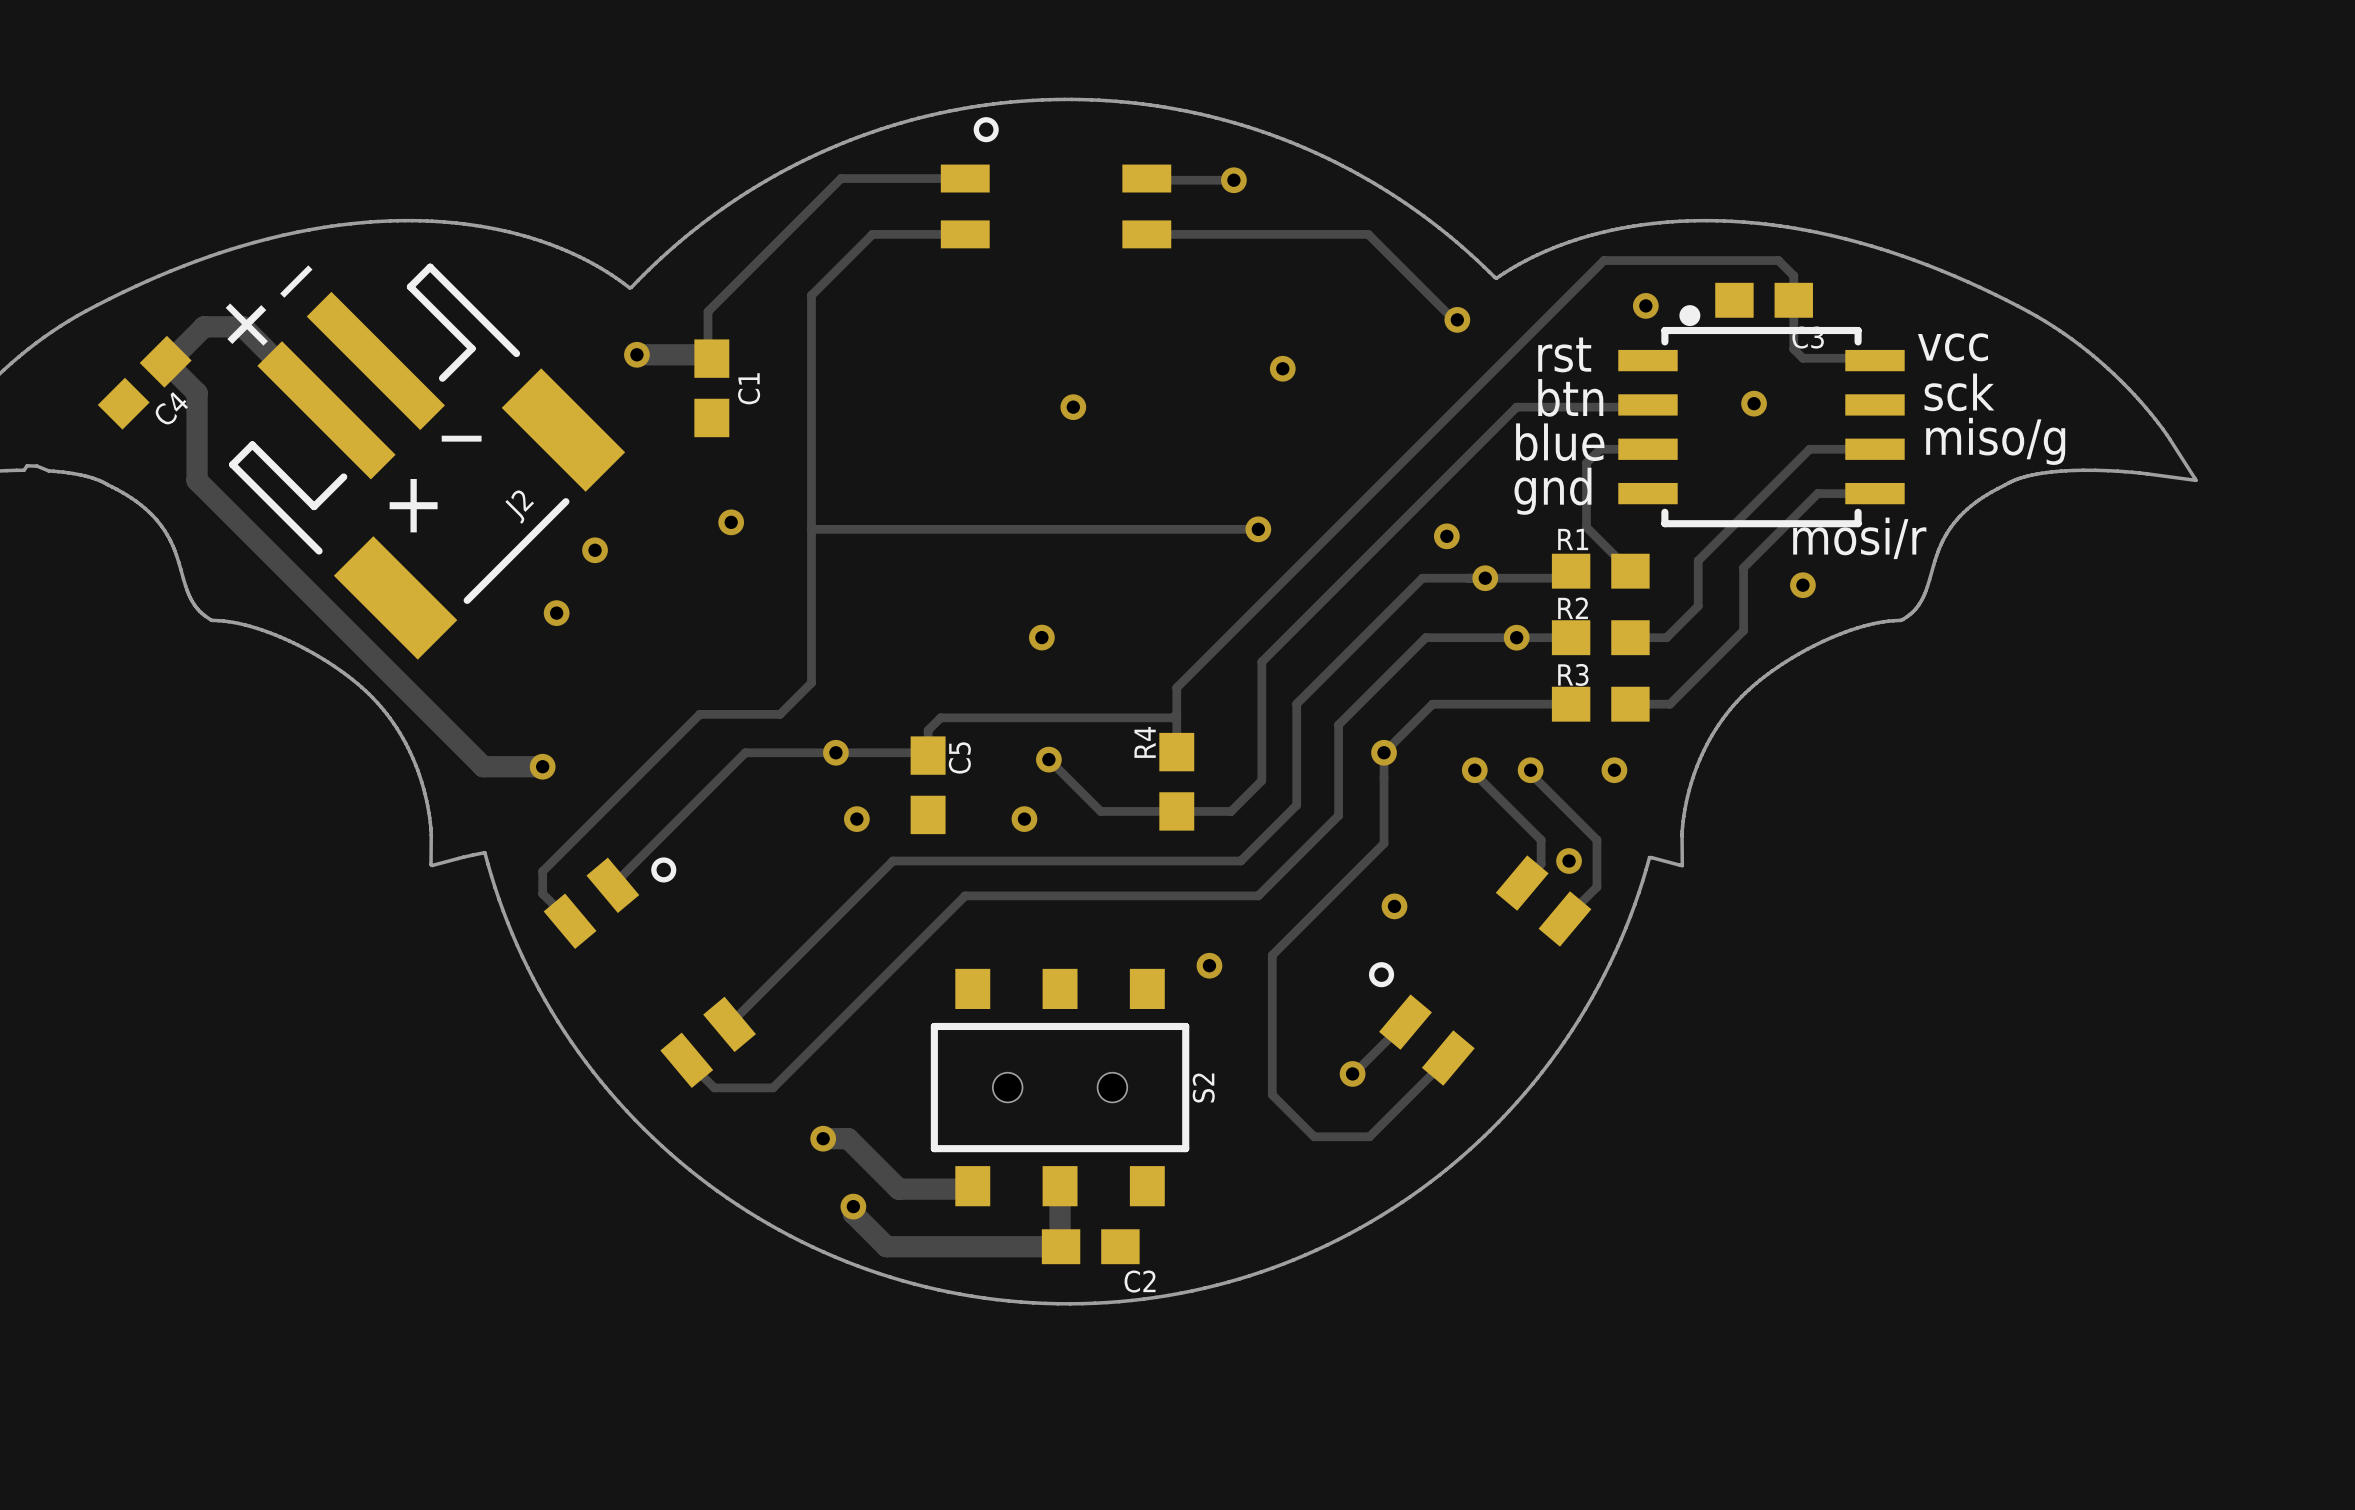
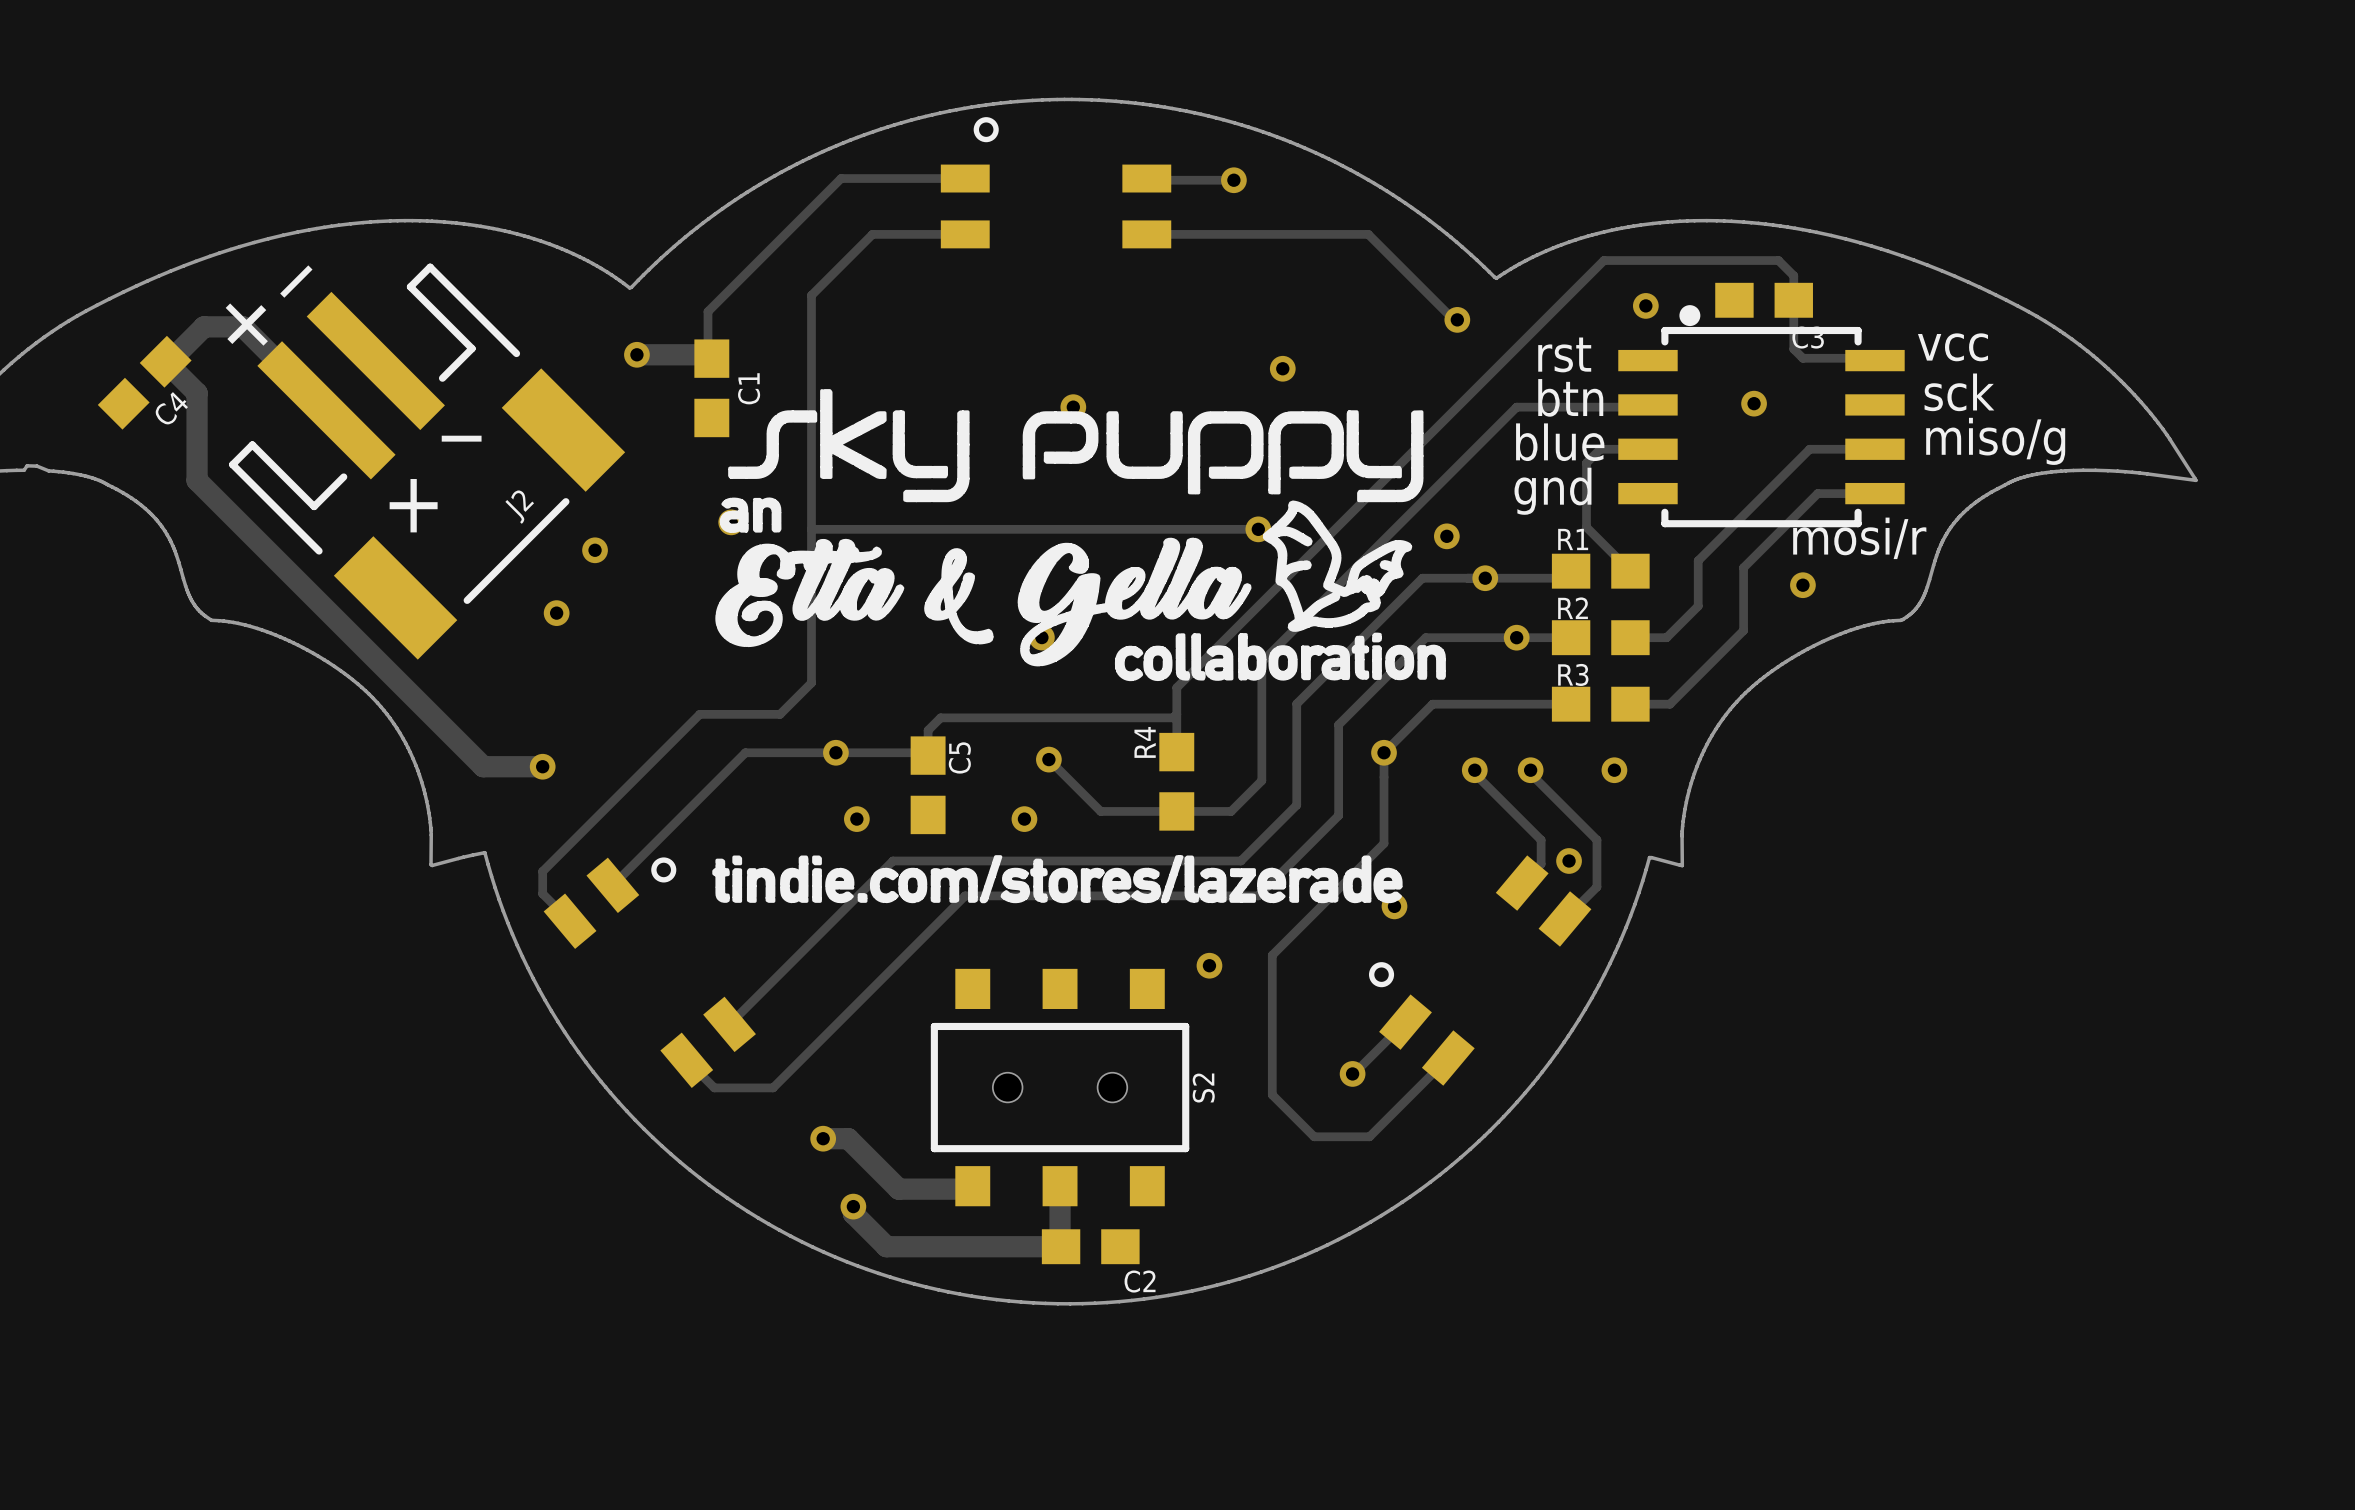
drawing: none -> [715, 389, 1446, 682]
drawing: none -> [712, 855, 1403, 904]

